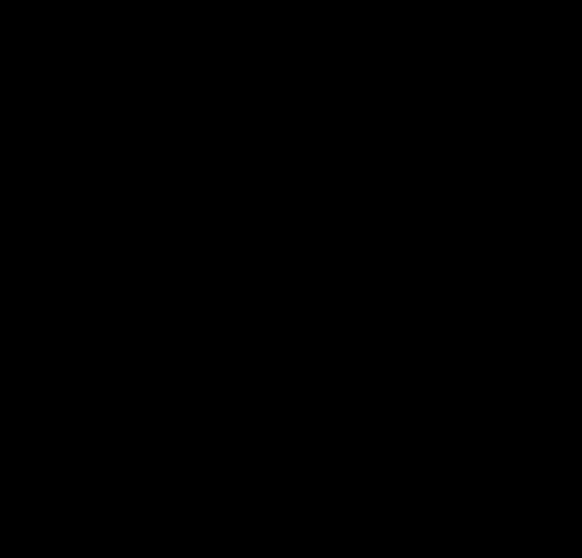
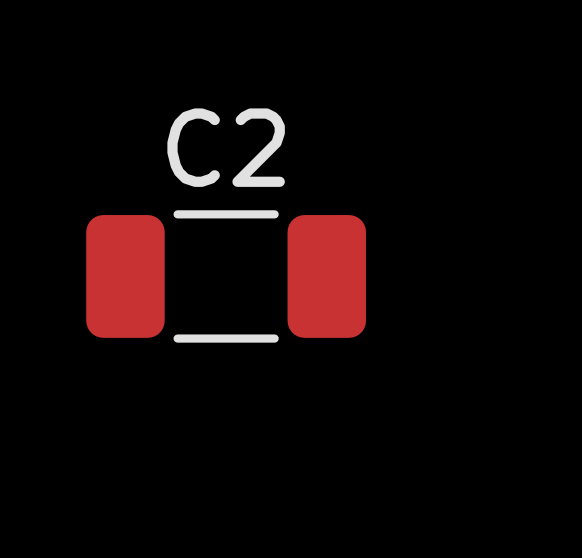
C2: none -> (226, 276)

